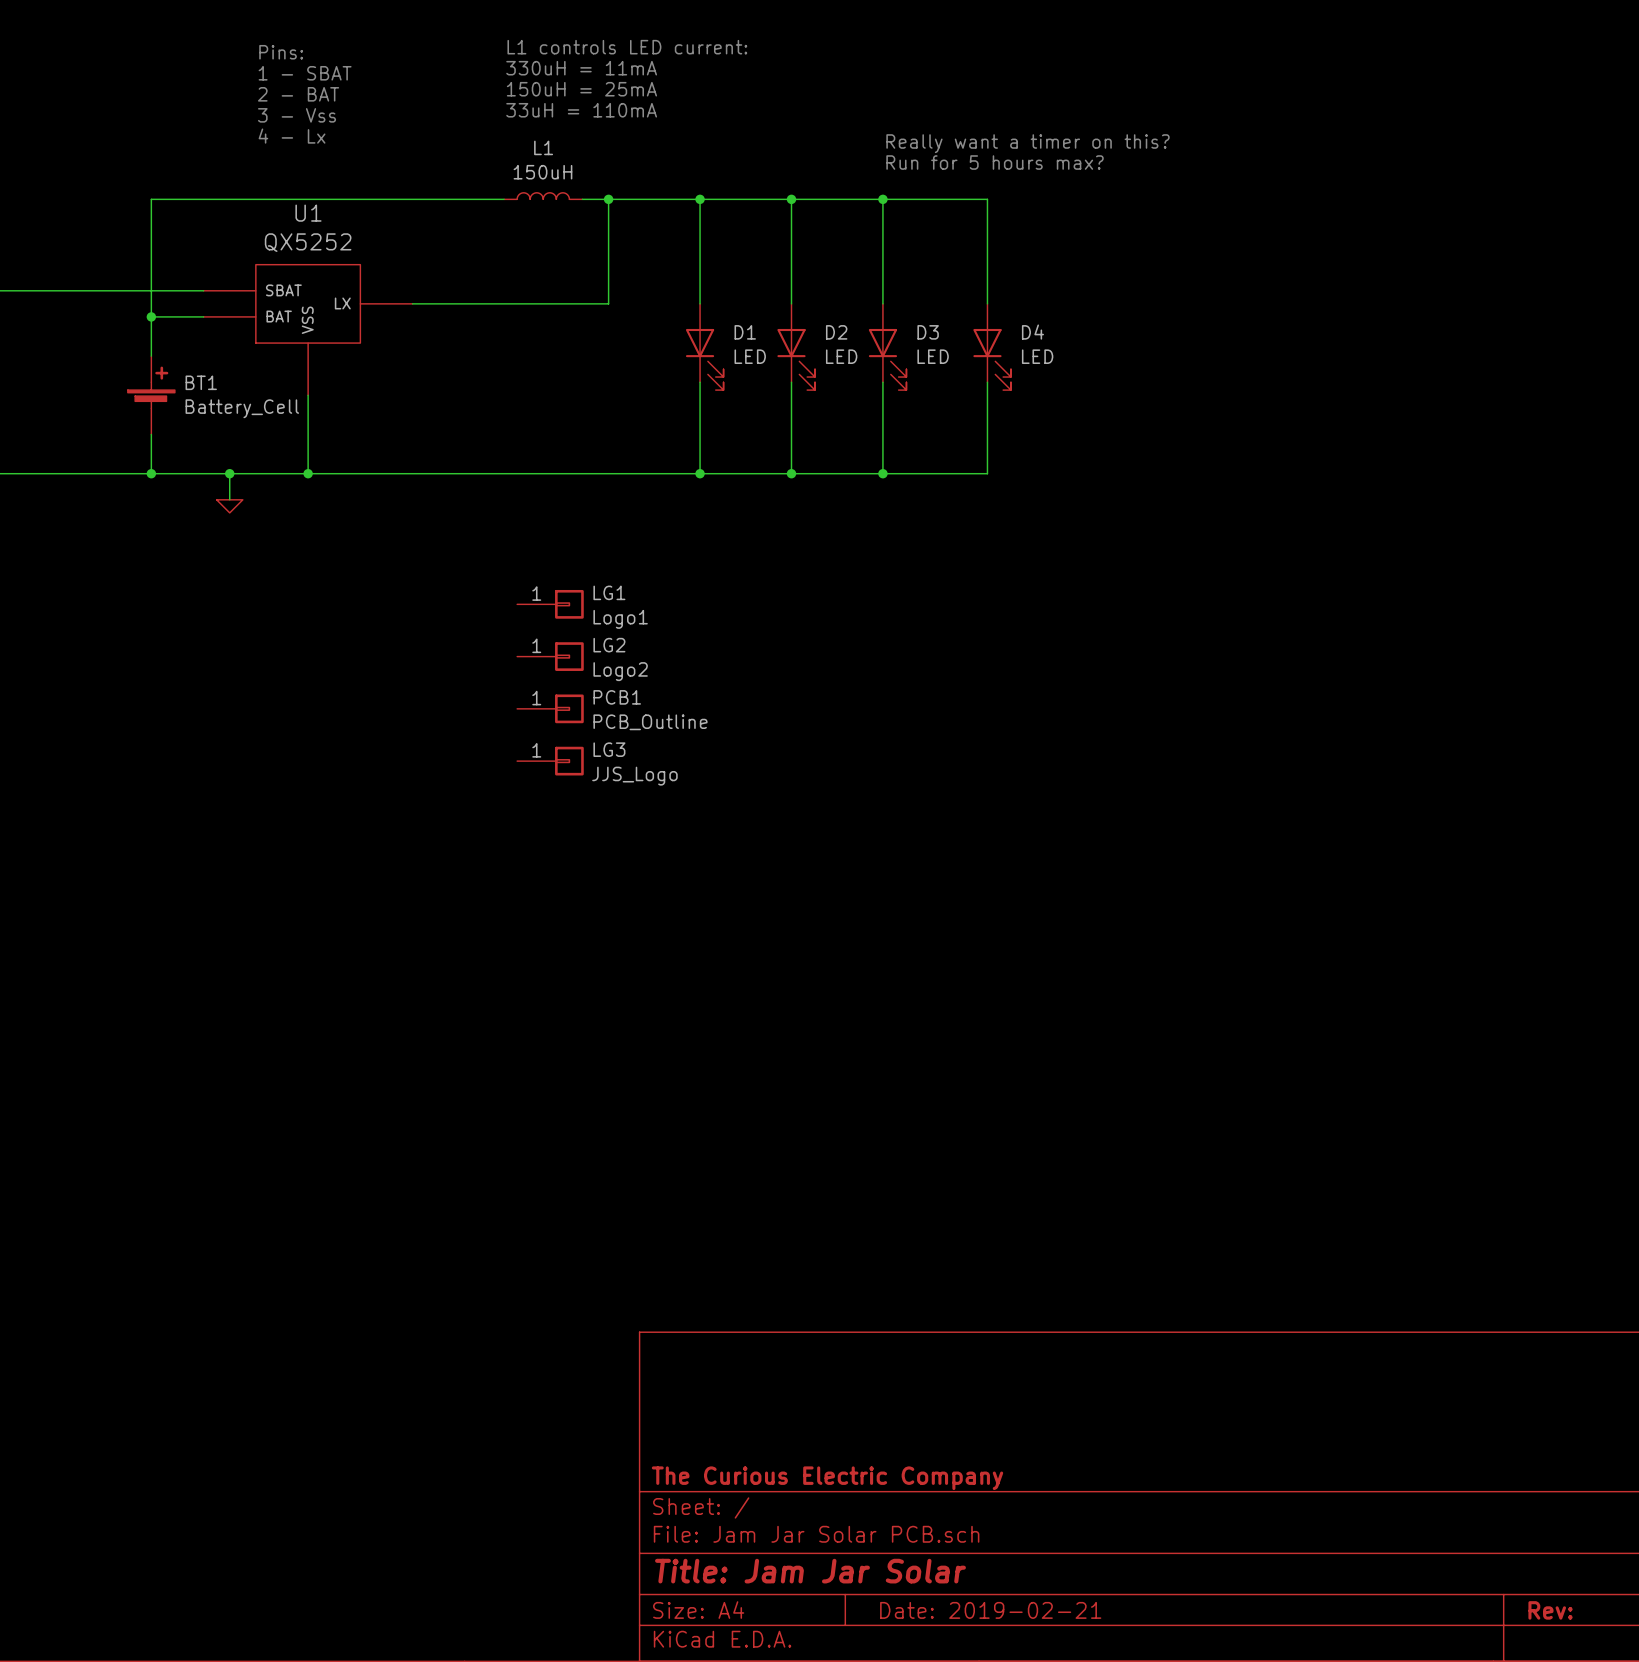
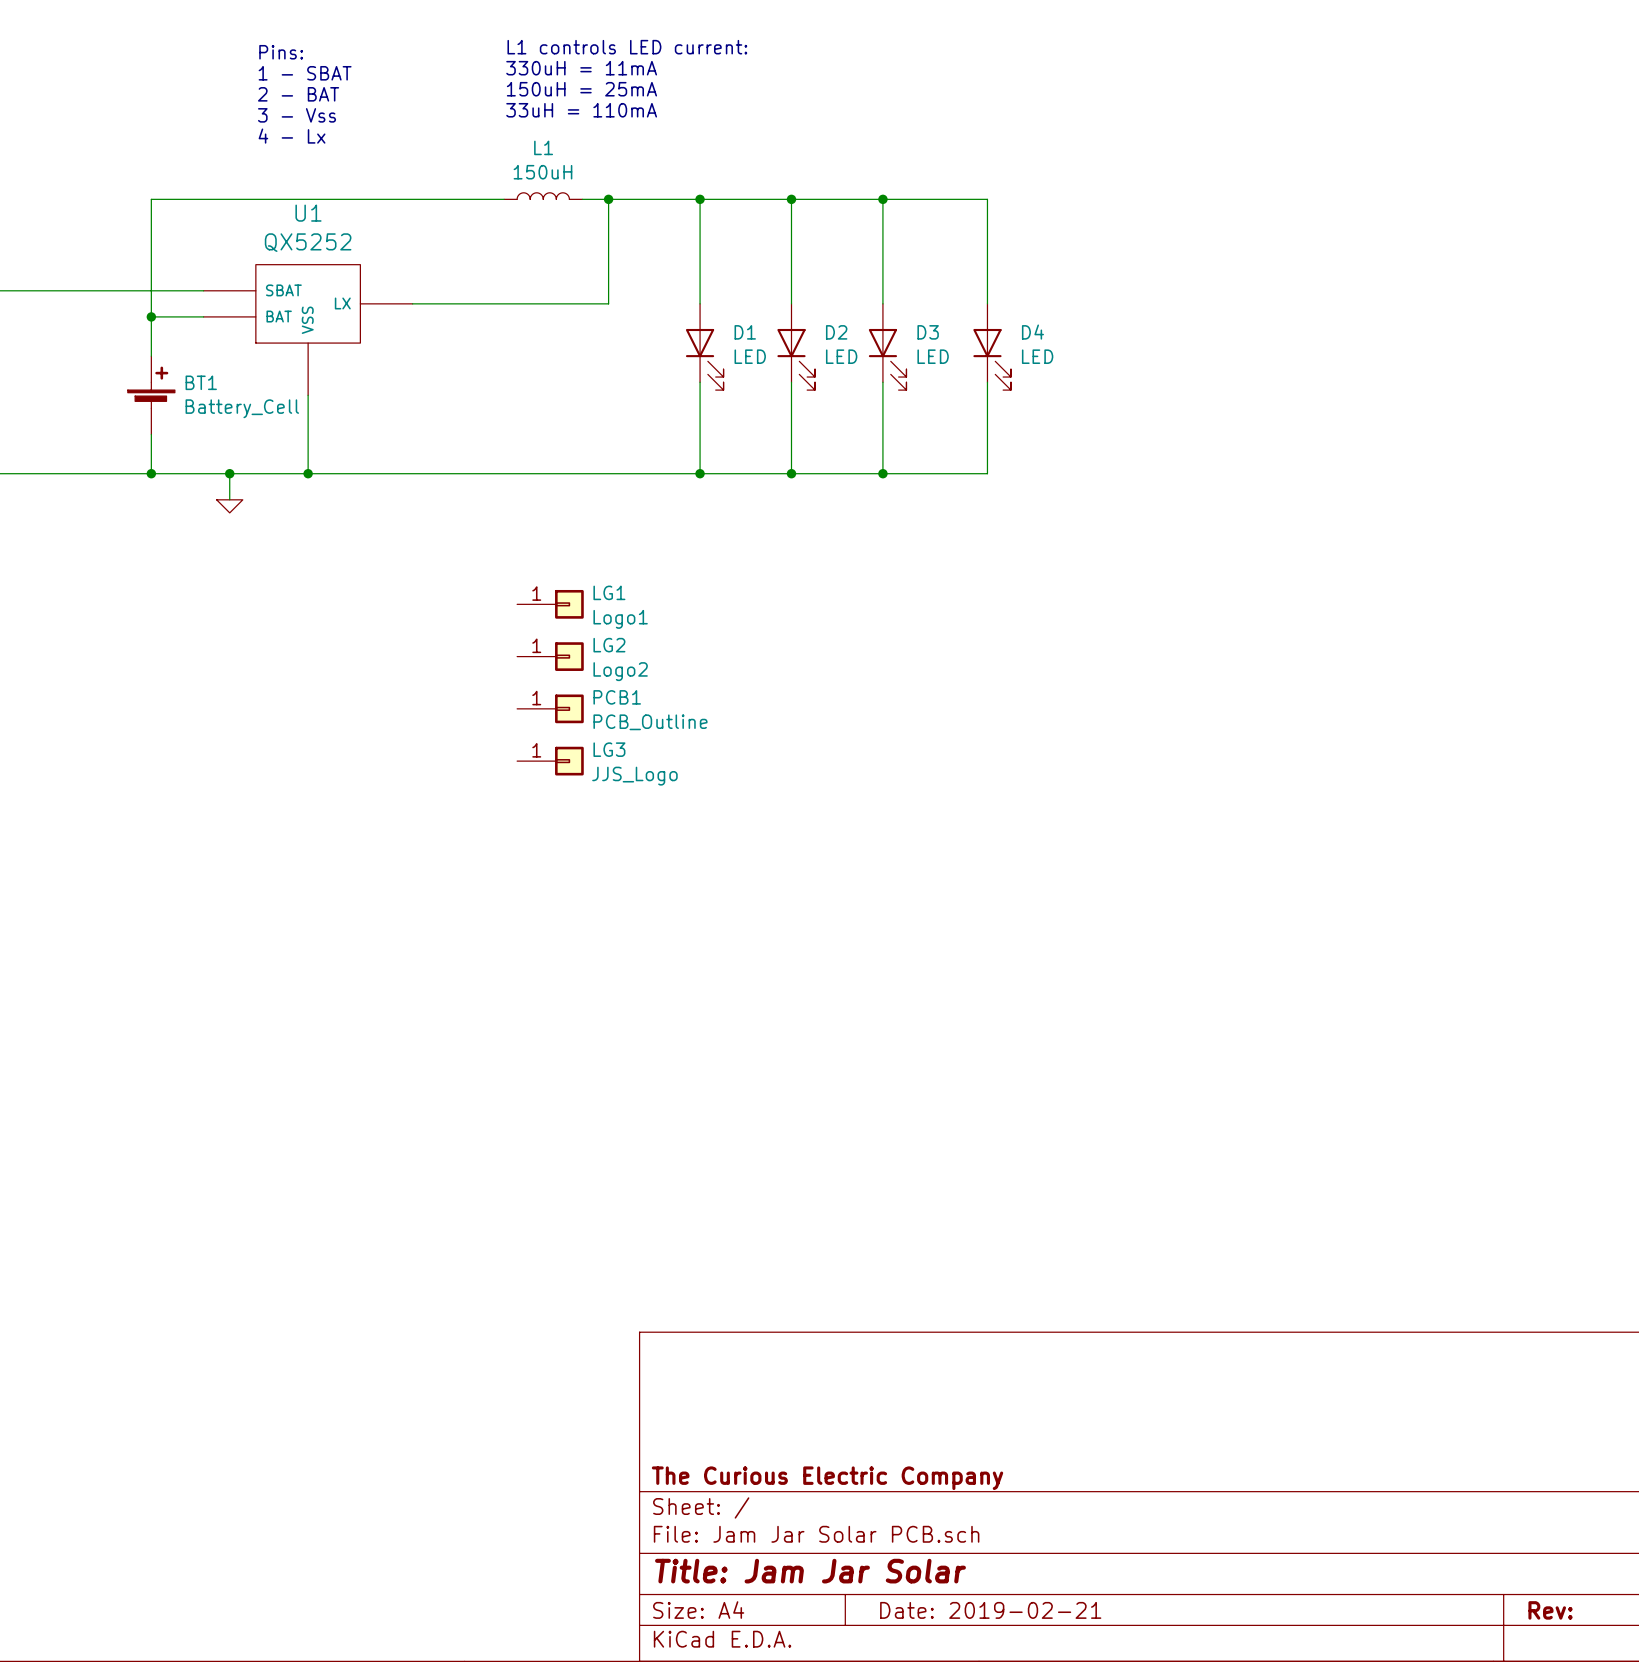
text: Really want a timer on this? (1027, 143) -> none
text: Run for 5 hours max? (995, 162) -> none

